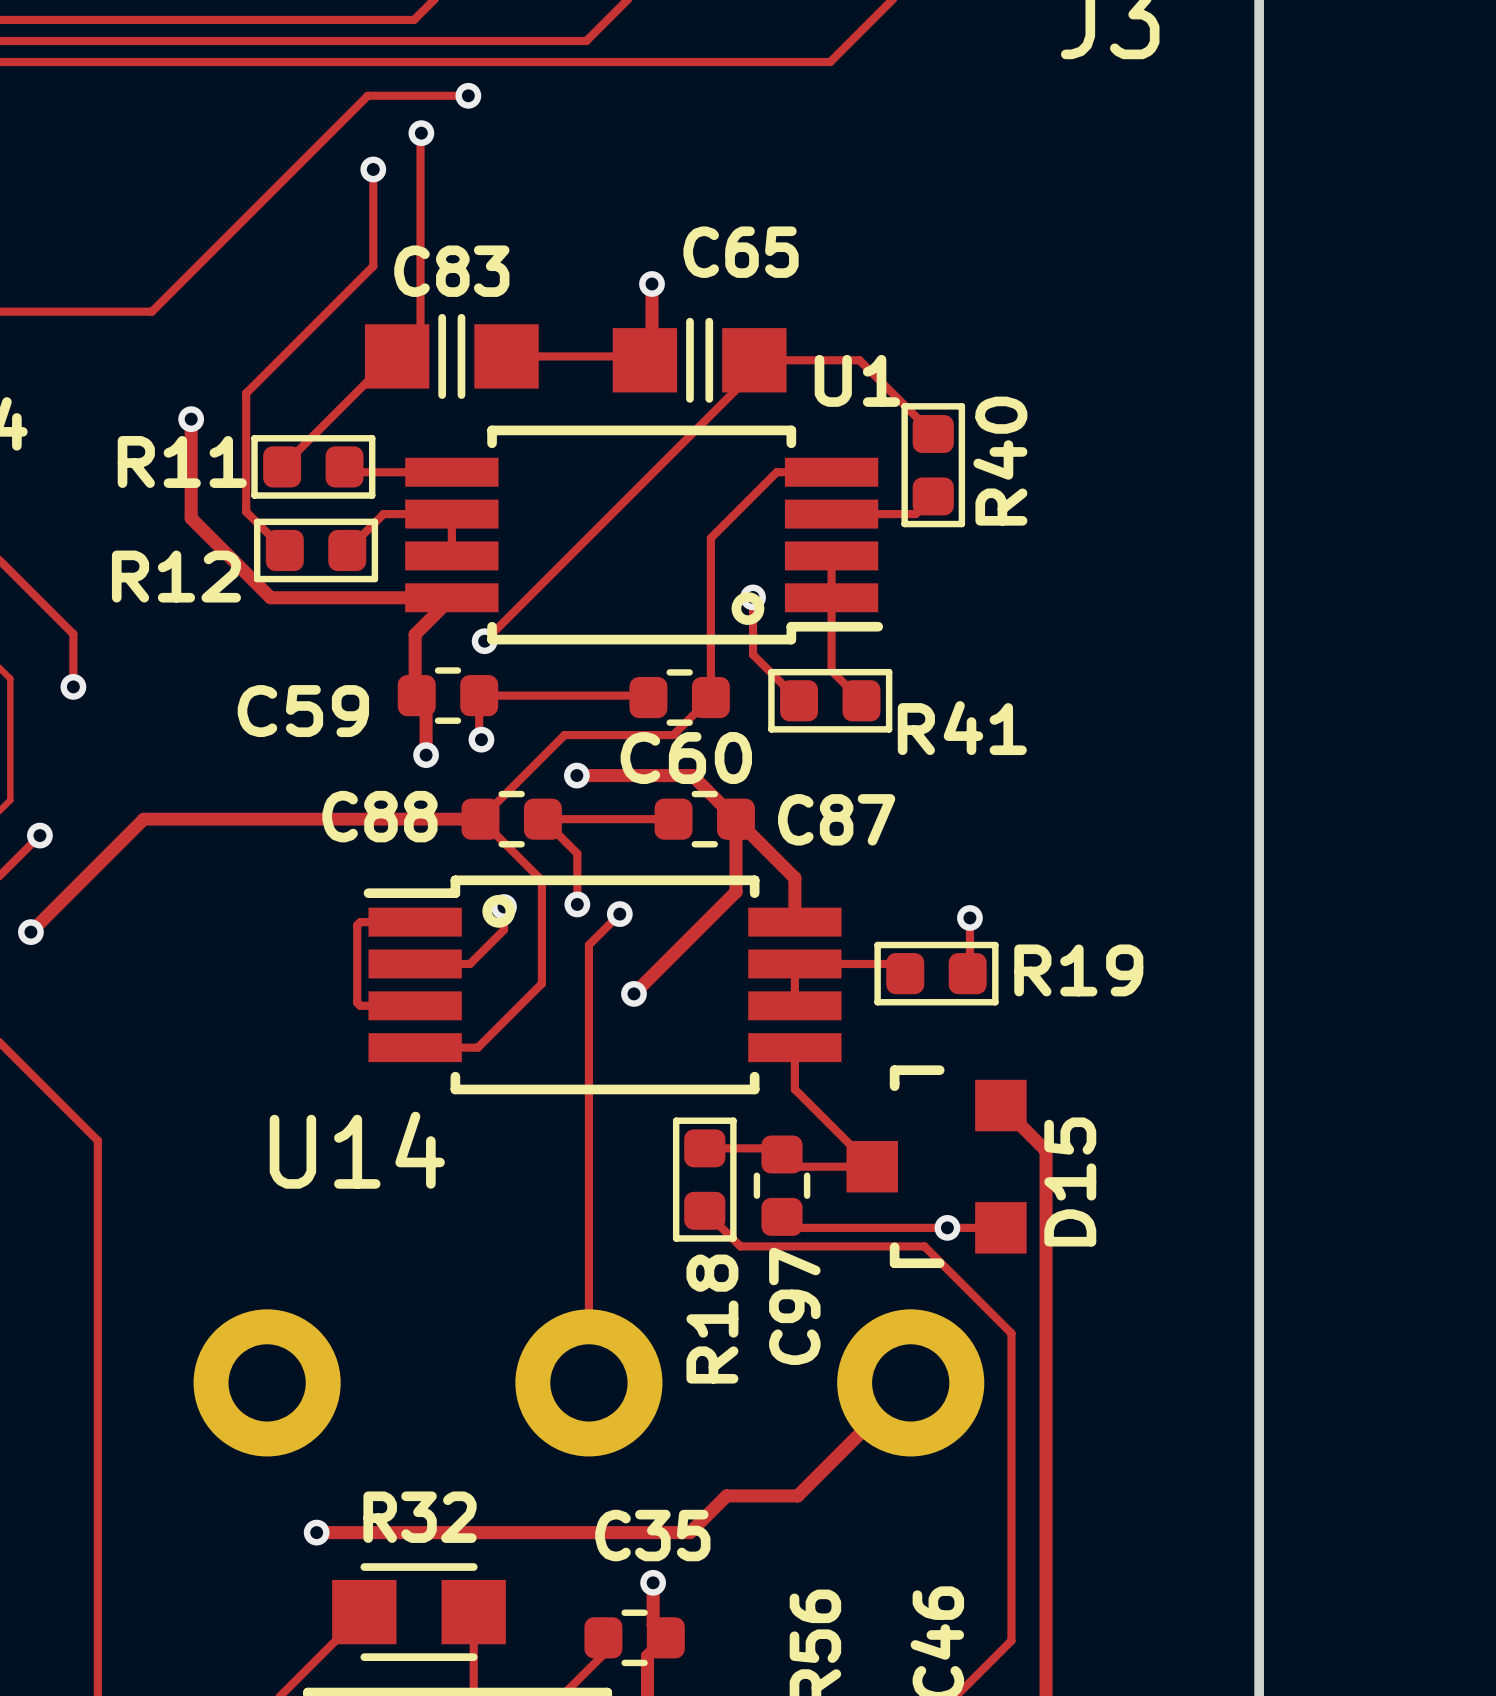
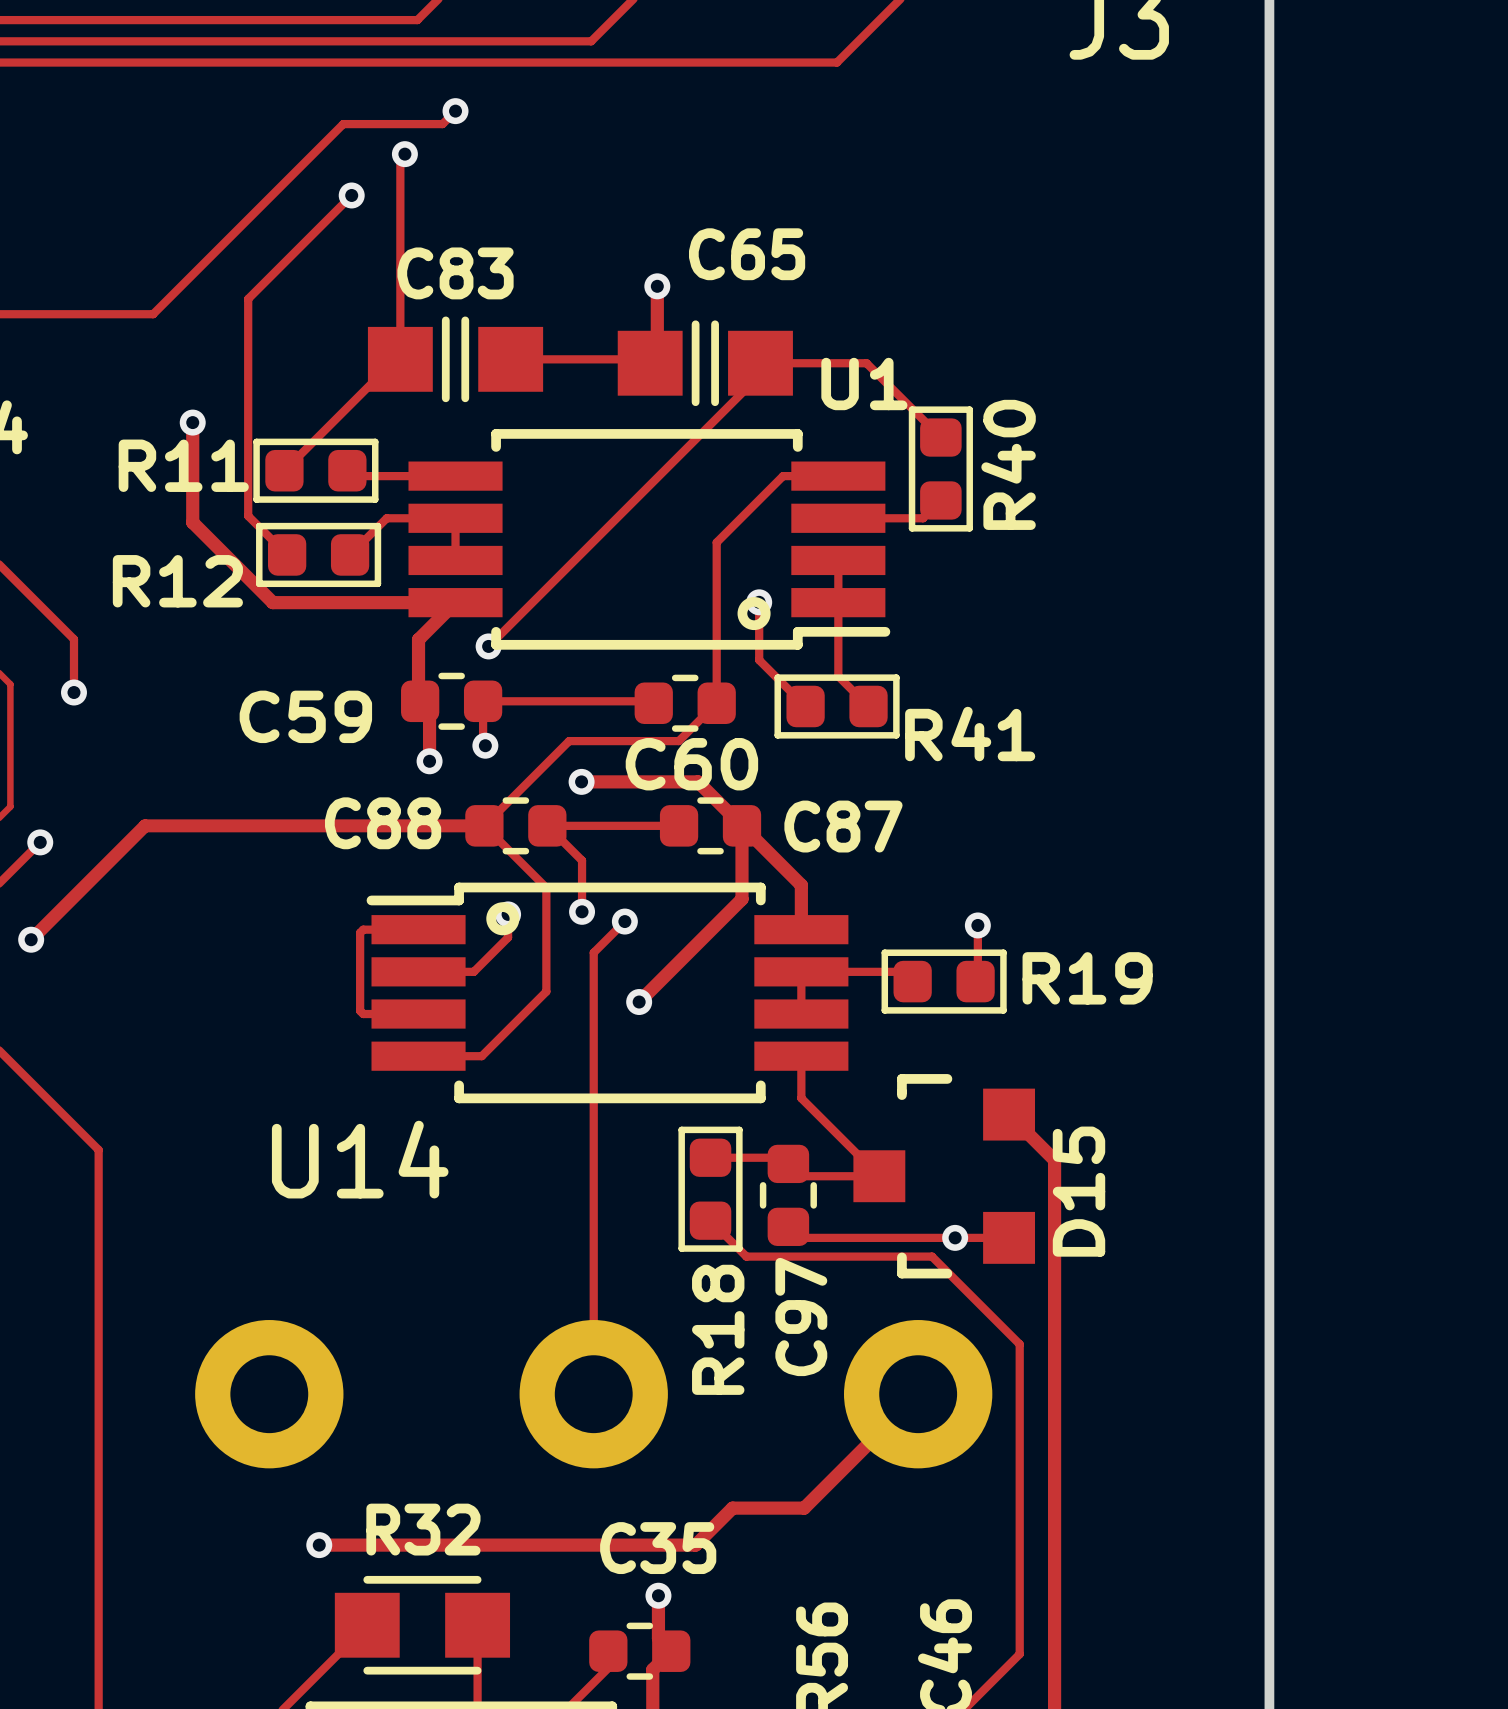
track: (468, 95) (367, 95) (340, 123) -> (455, 111) (442, 124) (343, 124)
via position: (468, 95) -> (455, 111)
via position: (421, 133) -> (404, 154)
track: (420, 134) (420, 333) (397, 356) -> (404, 154) (400, 158) (400, 359)
track: (373, 169) (373, 266) (246, 393) -> (351, 195) (248, 298) (248, 396)
via position: (373, 169) -> (351, 195)

